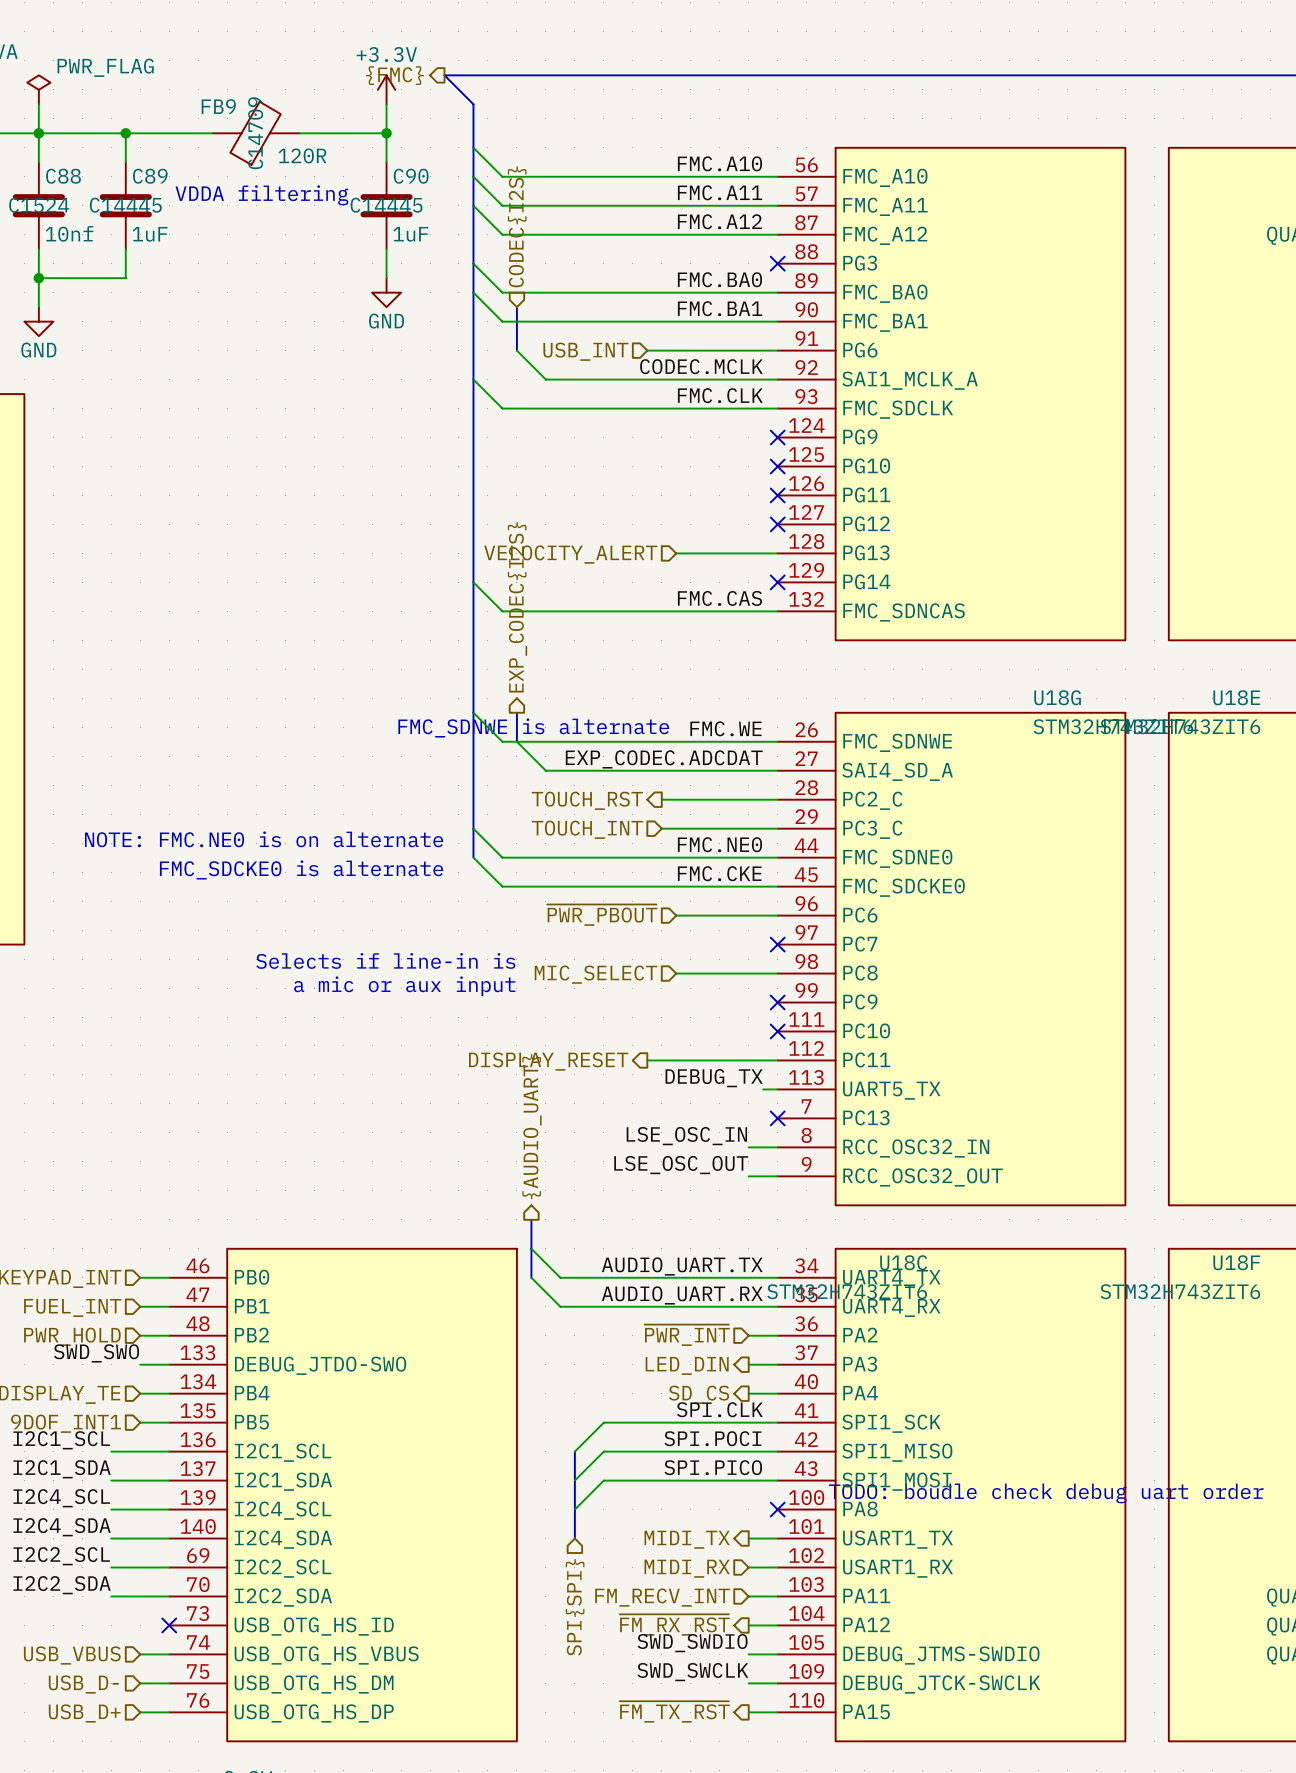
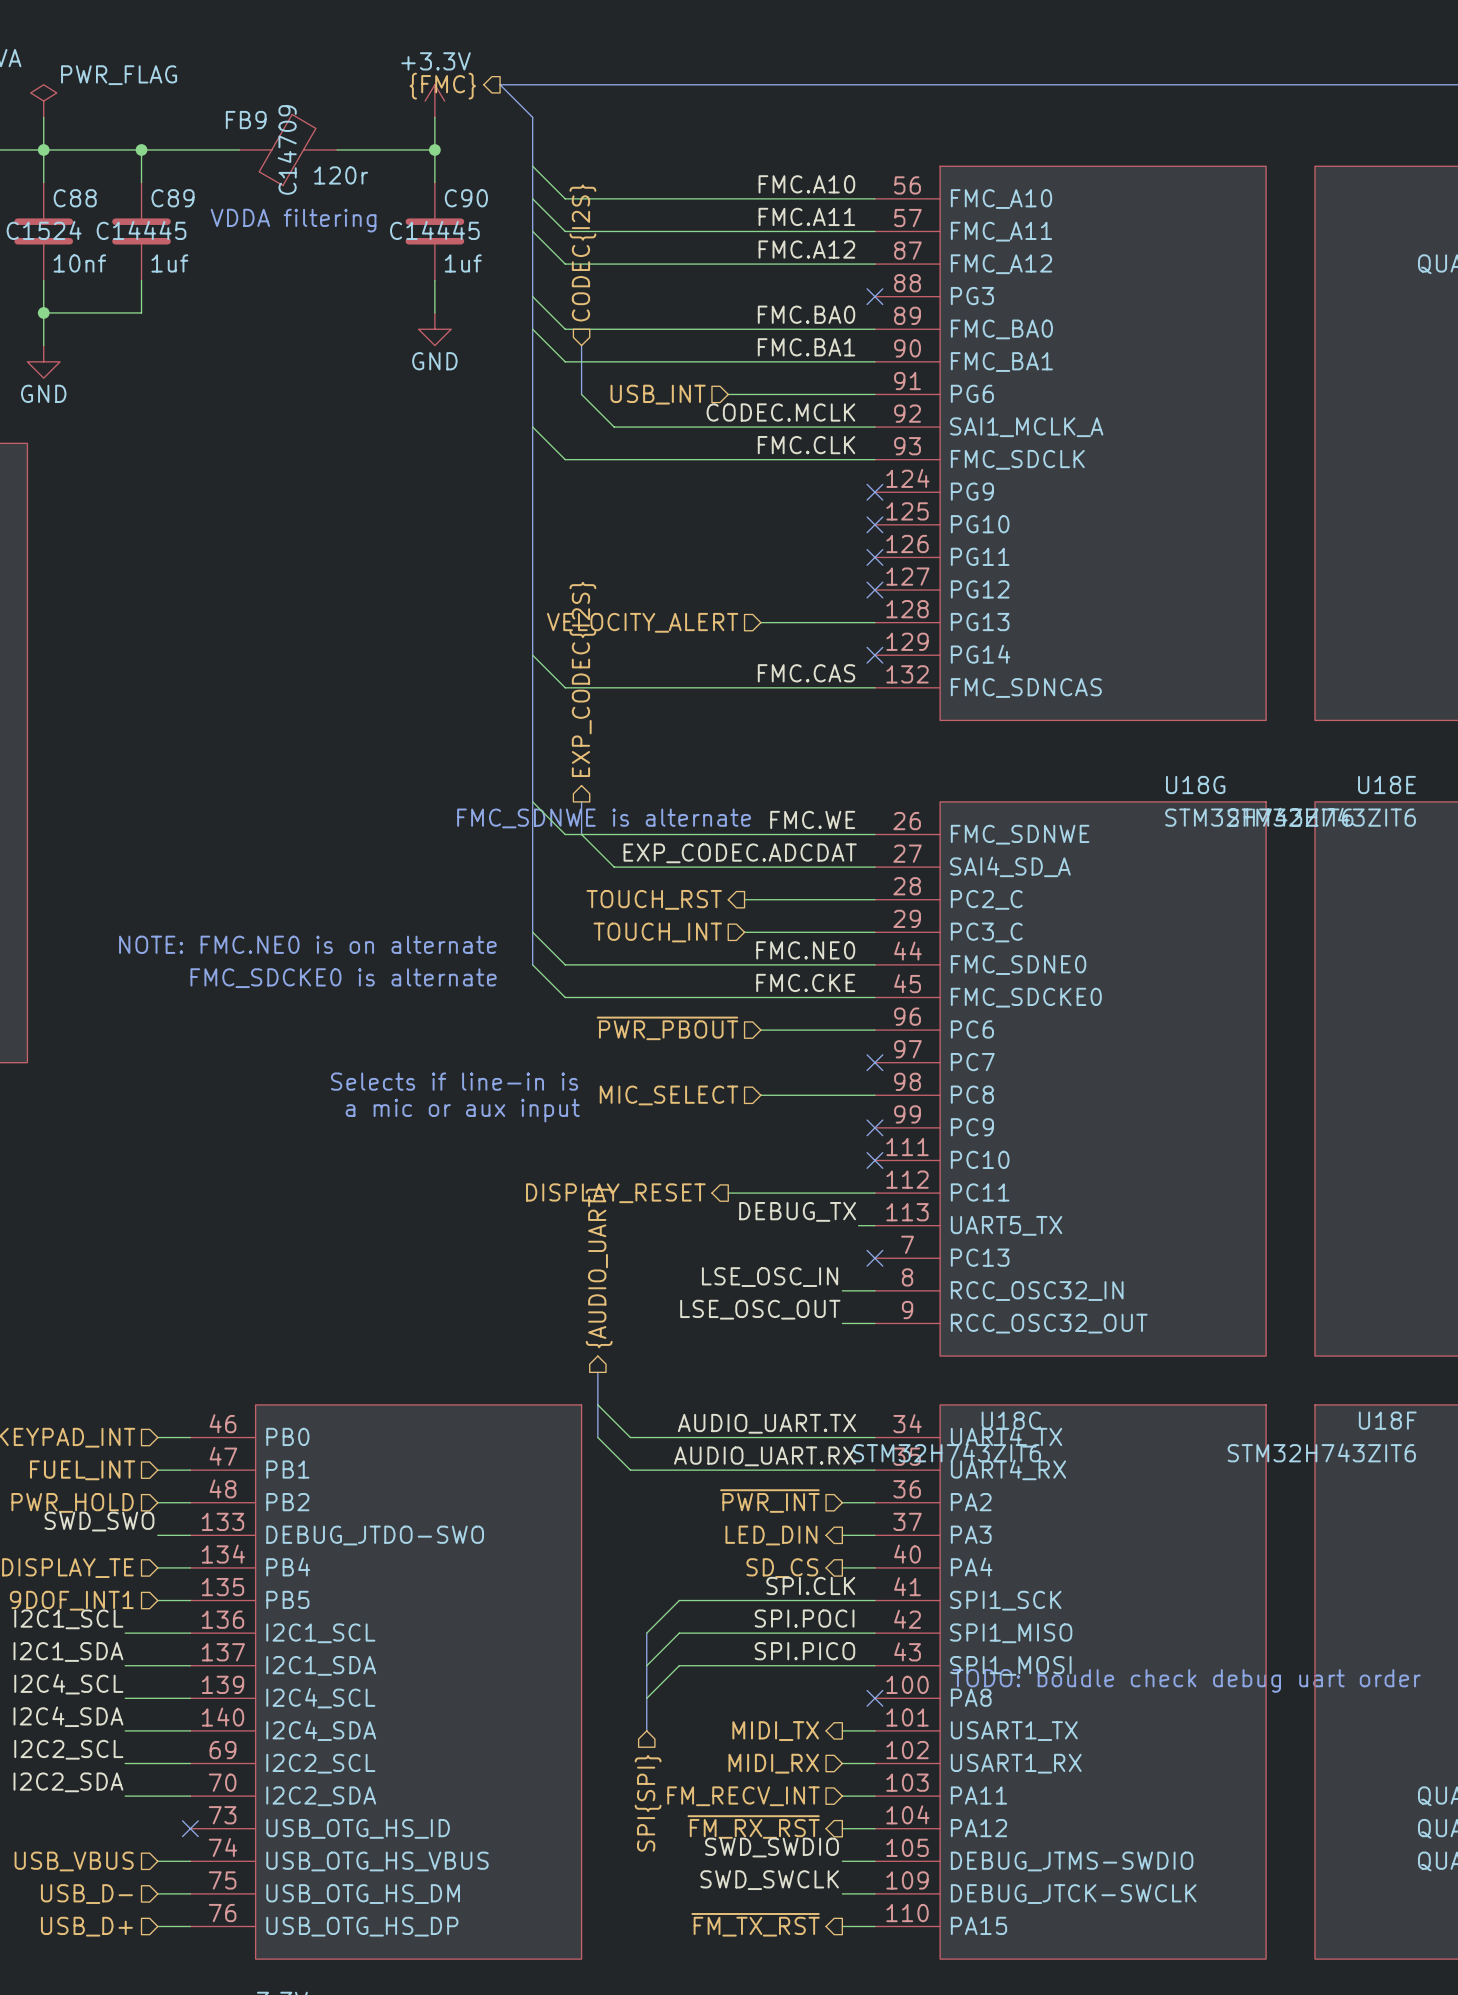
FB9 value: 120R (302, 155) -> 120r (341, 175)
C89 value: 1uF (150, 234) -> 1uf (169, 263)
C90 value: 1uF (410, 234) -> 1uf (463, 263)

